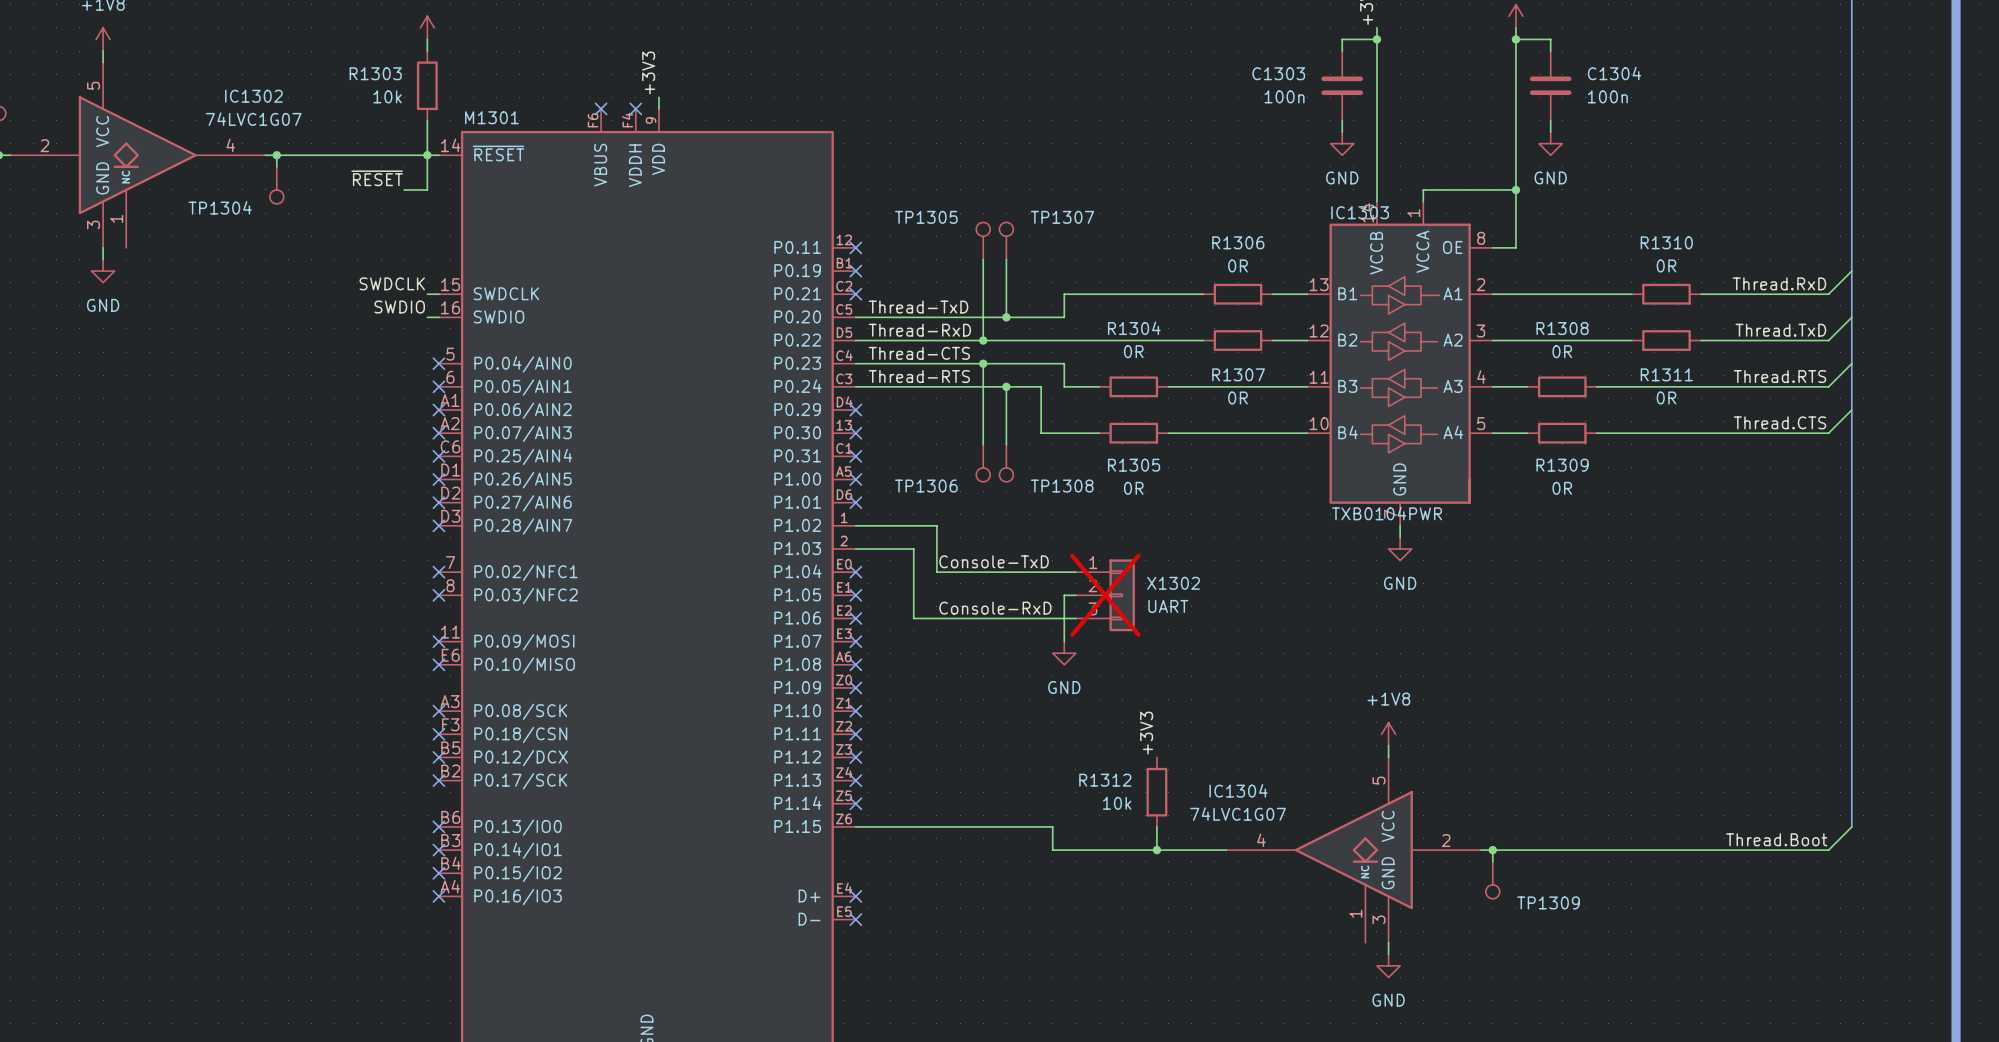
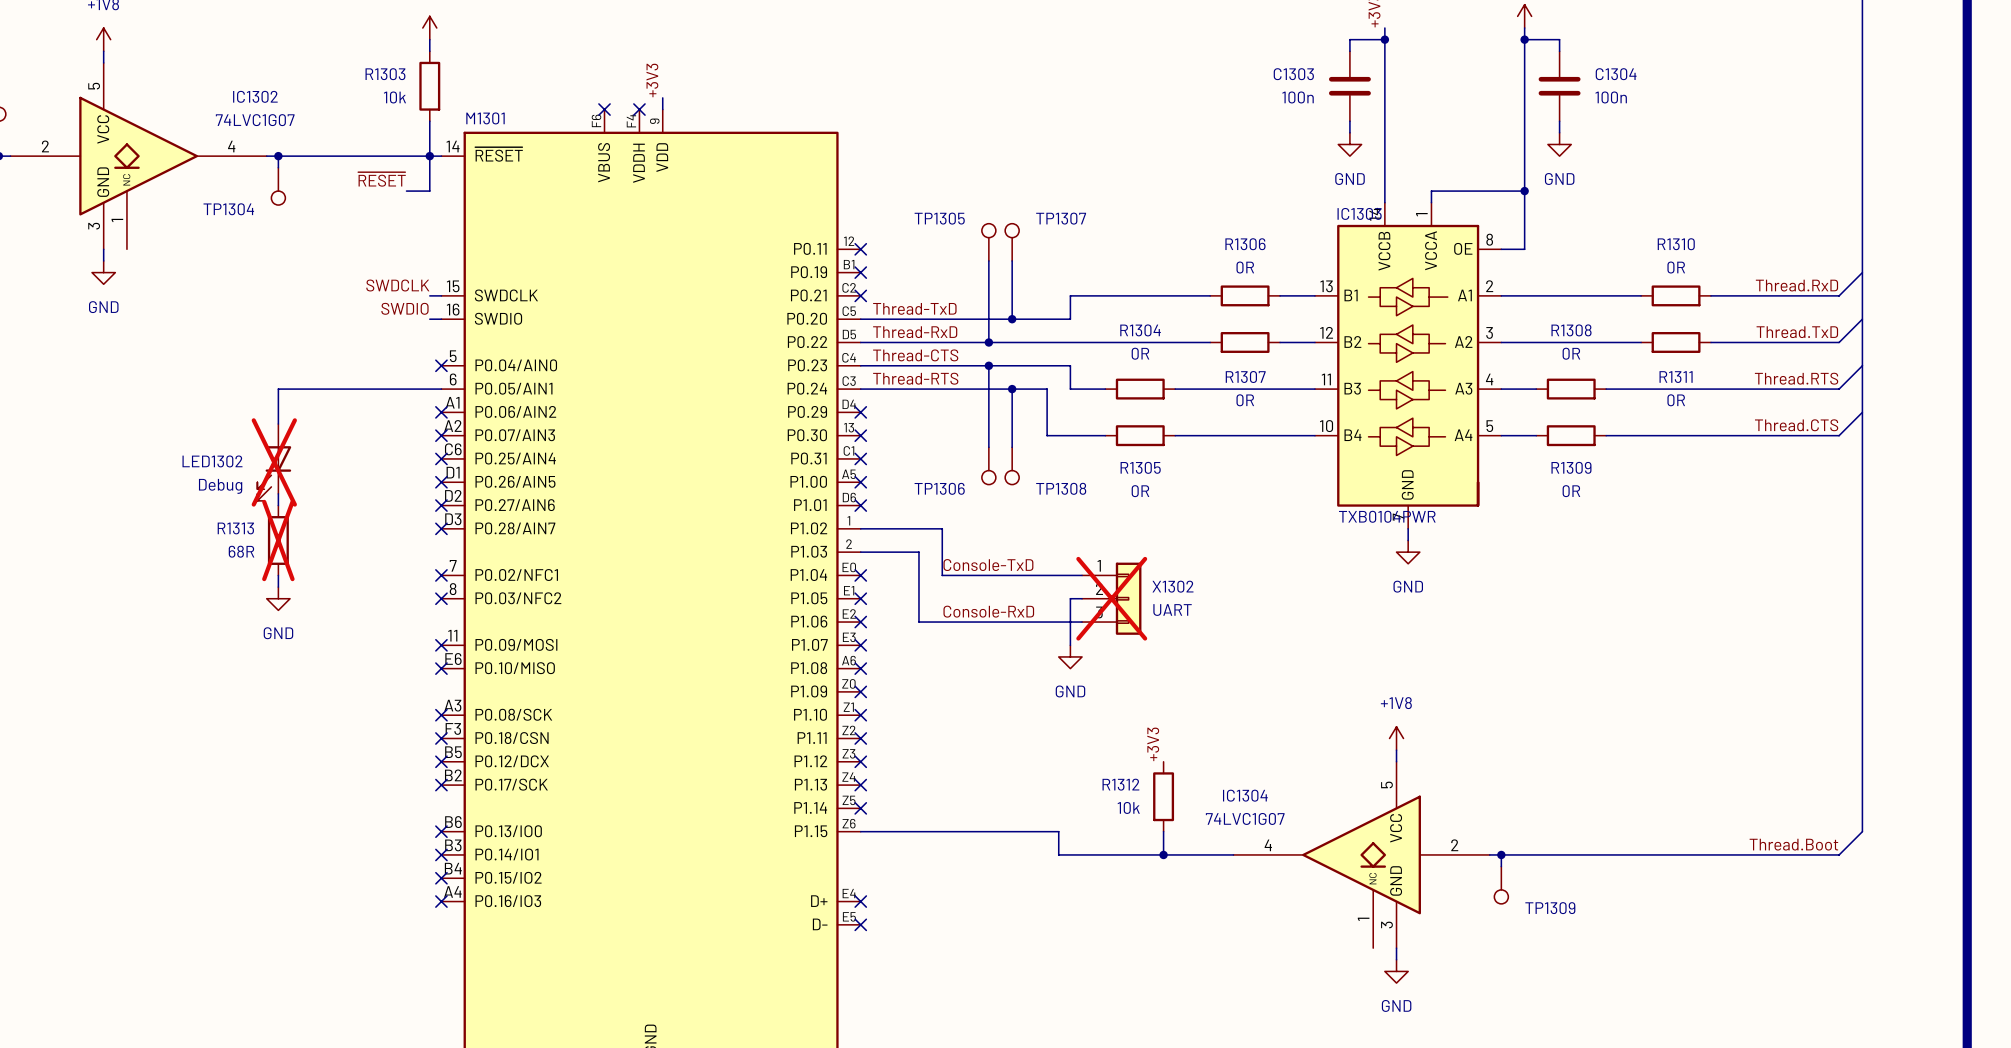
wire: none -> (441, 389) (278, 389) (278, 424)
no-connect mark: (438, 386) -> none
LED1302: none -> Debug (274, 462)
wire: none -> (278, 493) (278, 505)
R1313: none -> 68R (278, 540)
wire: none -> (278, 575) (278, 587)
power symbol: none -> GND (278, 598)

